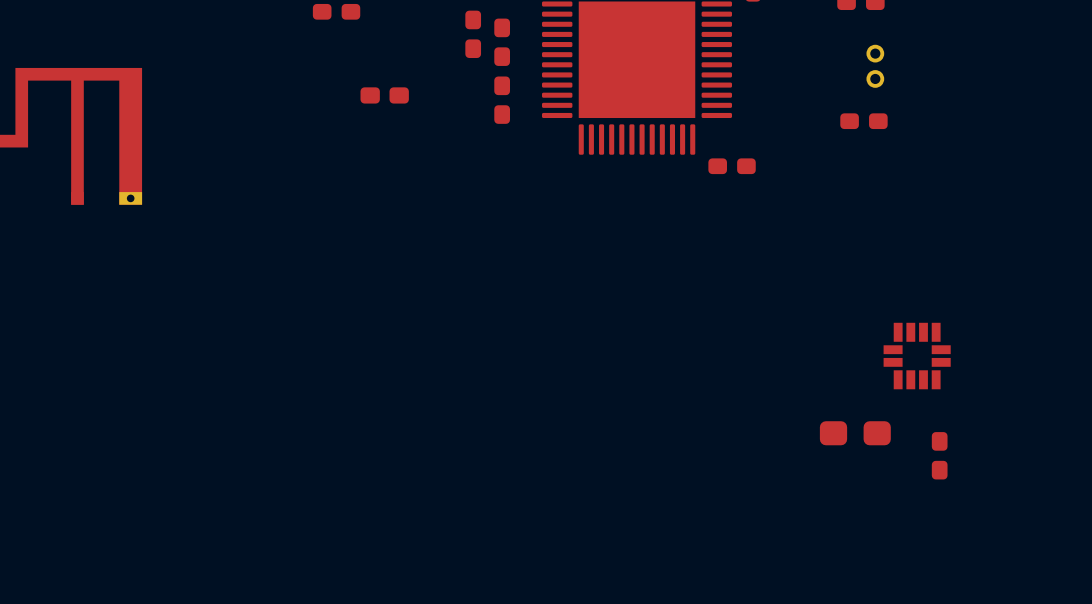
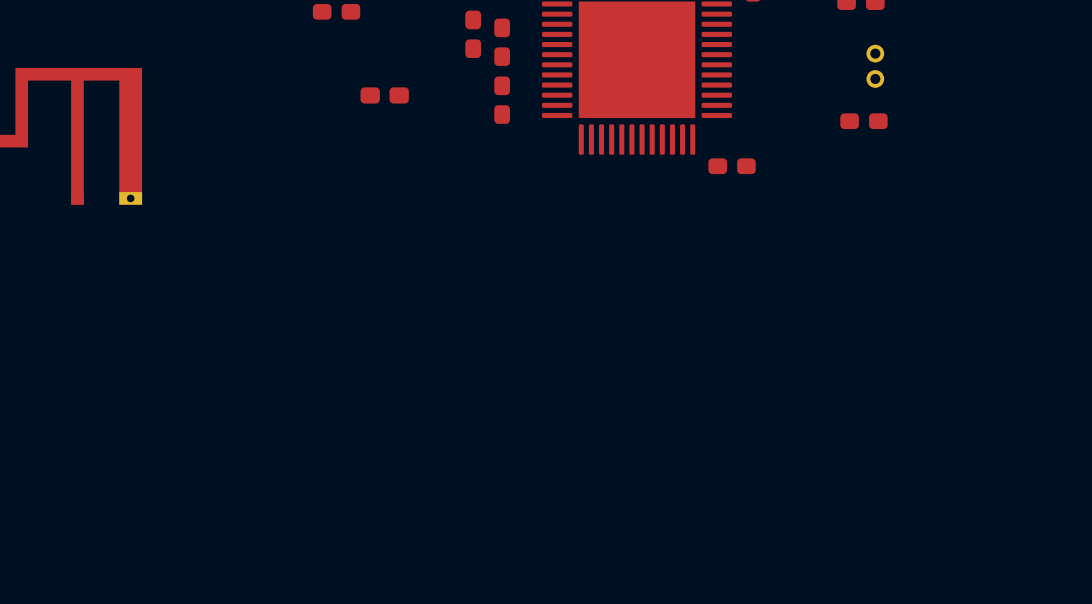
part: (917, 356) -> none
part: (855, 433) -> none
part: (939, 455) -> none

